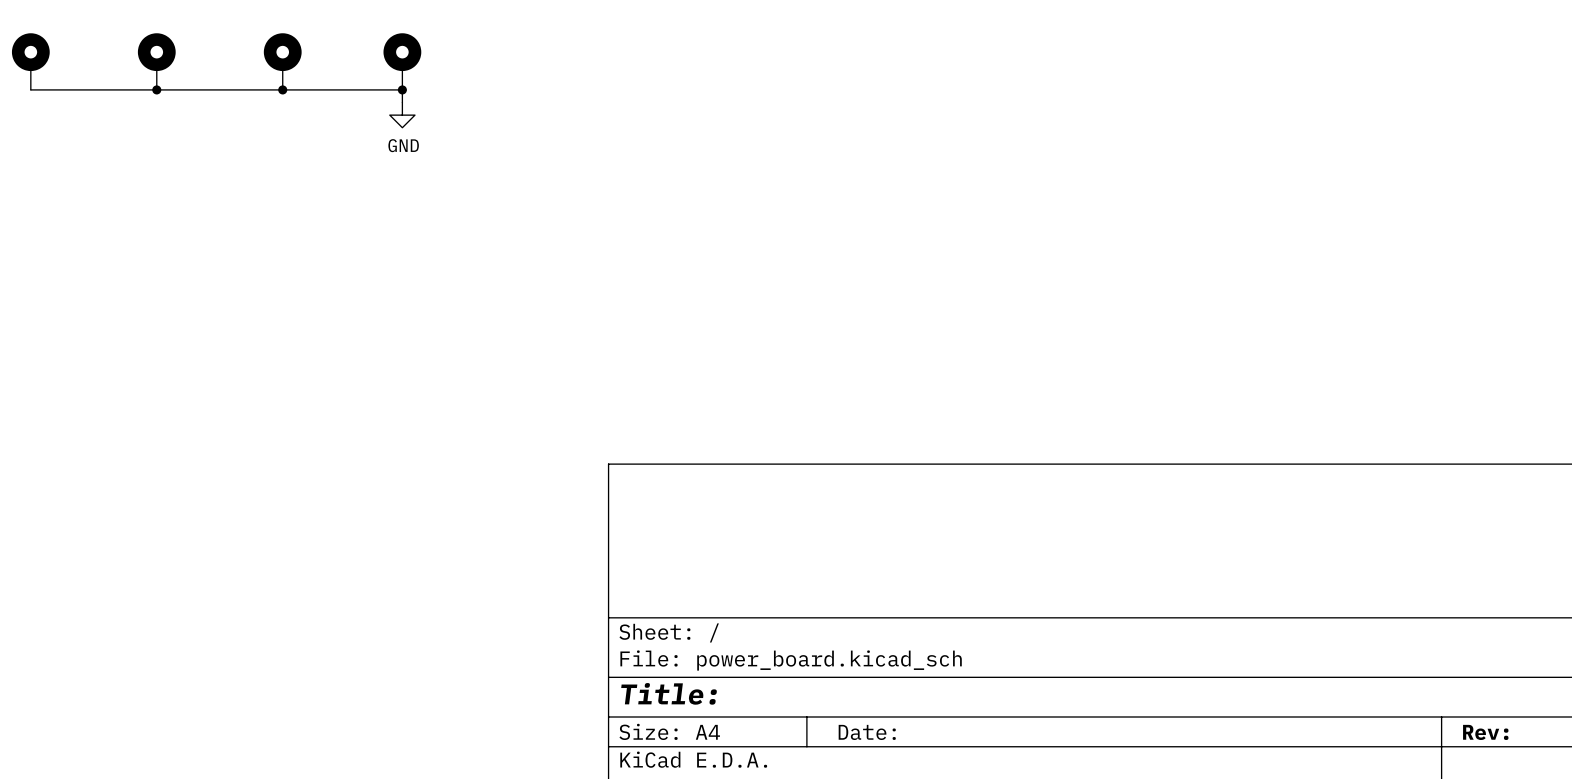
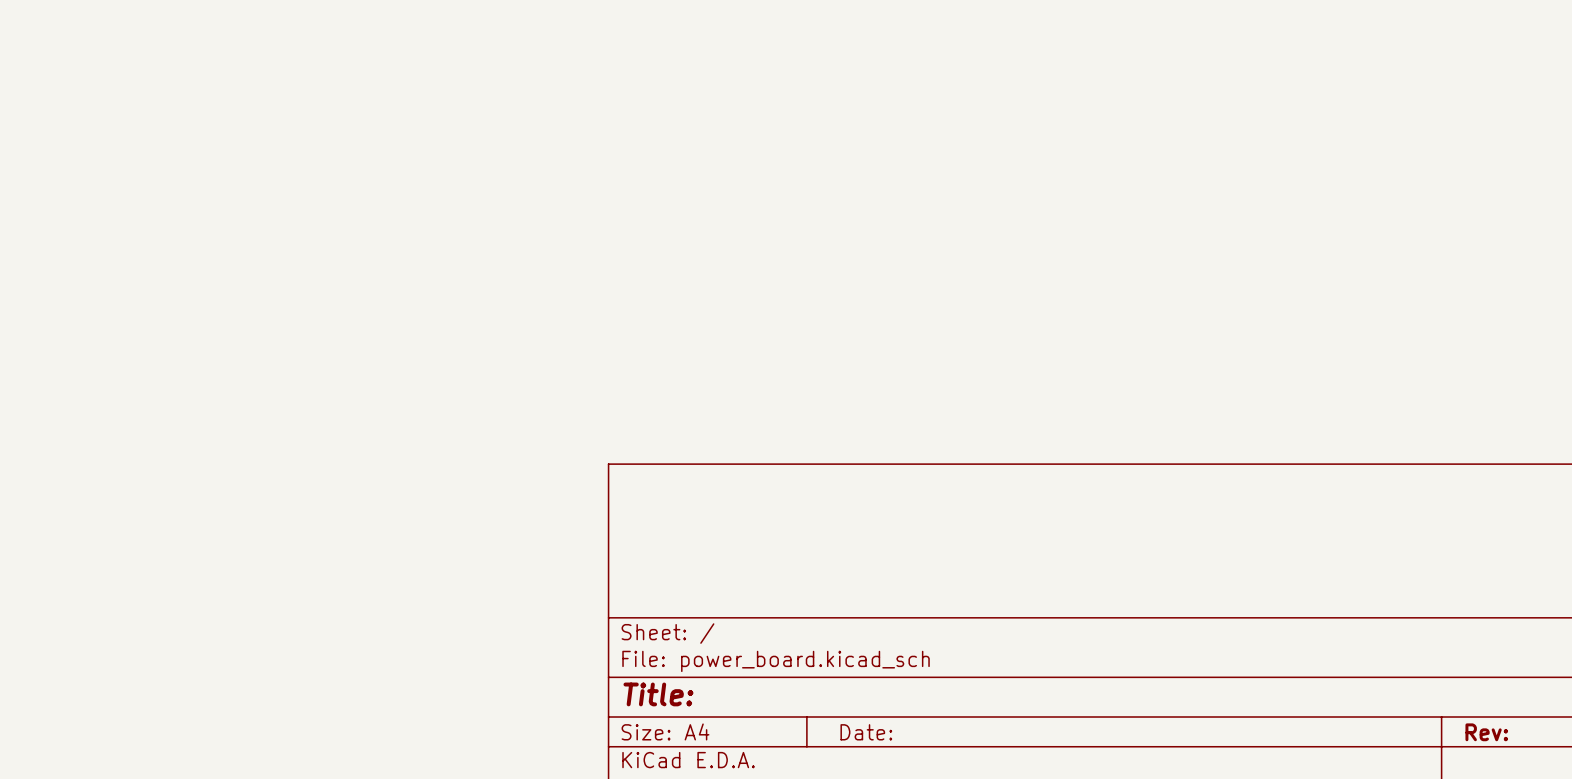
part: (30, 61) -> none
part: (156, 61) -> none
part: (282, 61) -> none
part: (402, 61) -> none
wire: (30, 89) (402, 89) (402, 102) -> none
junction: (156, 89) -> none
junction: (282, 89) -> none
junction: (402, 89) -> none
power symbol: GND (402, 115) -> none

